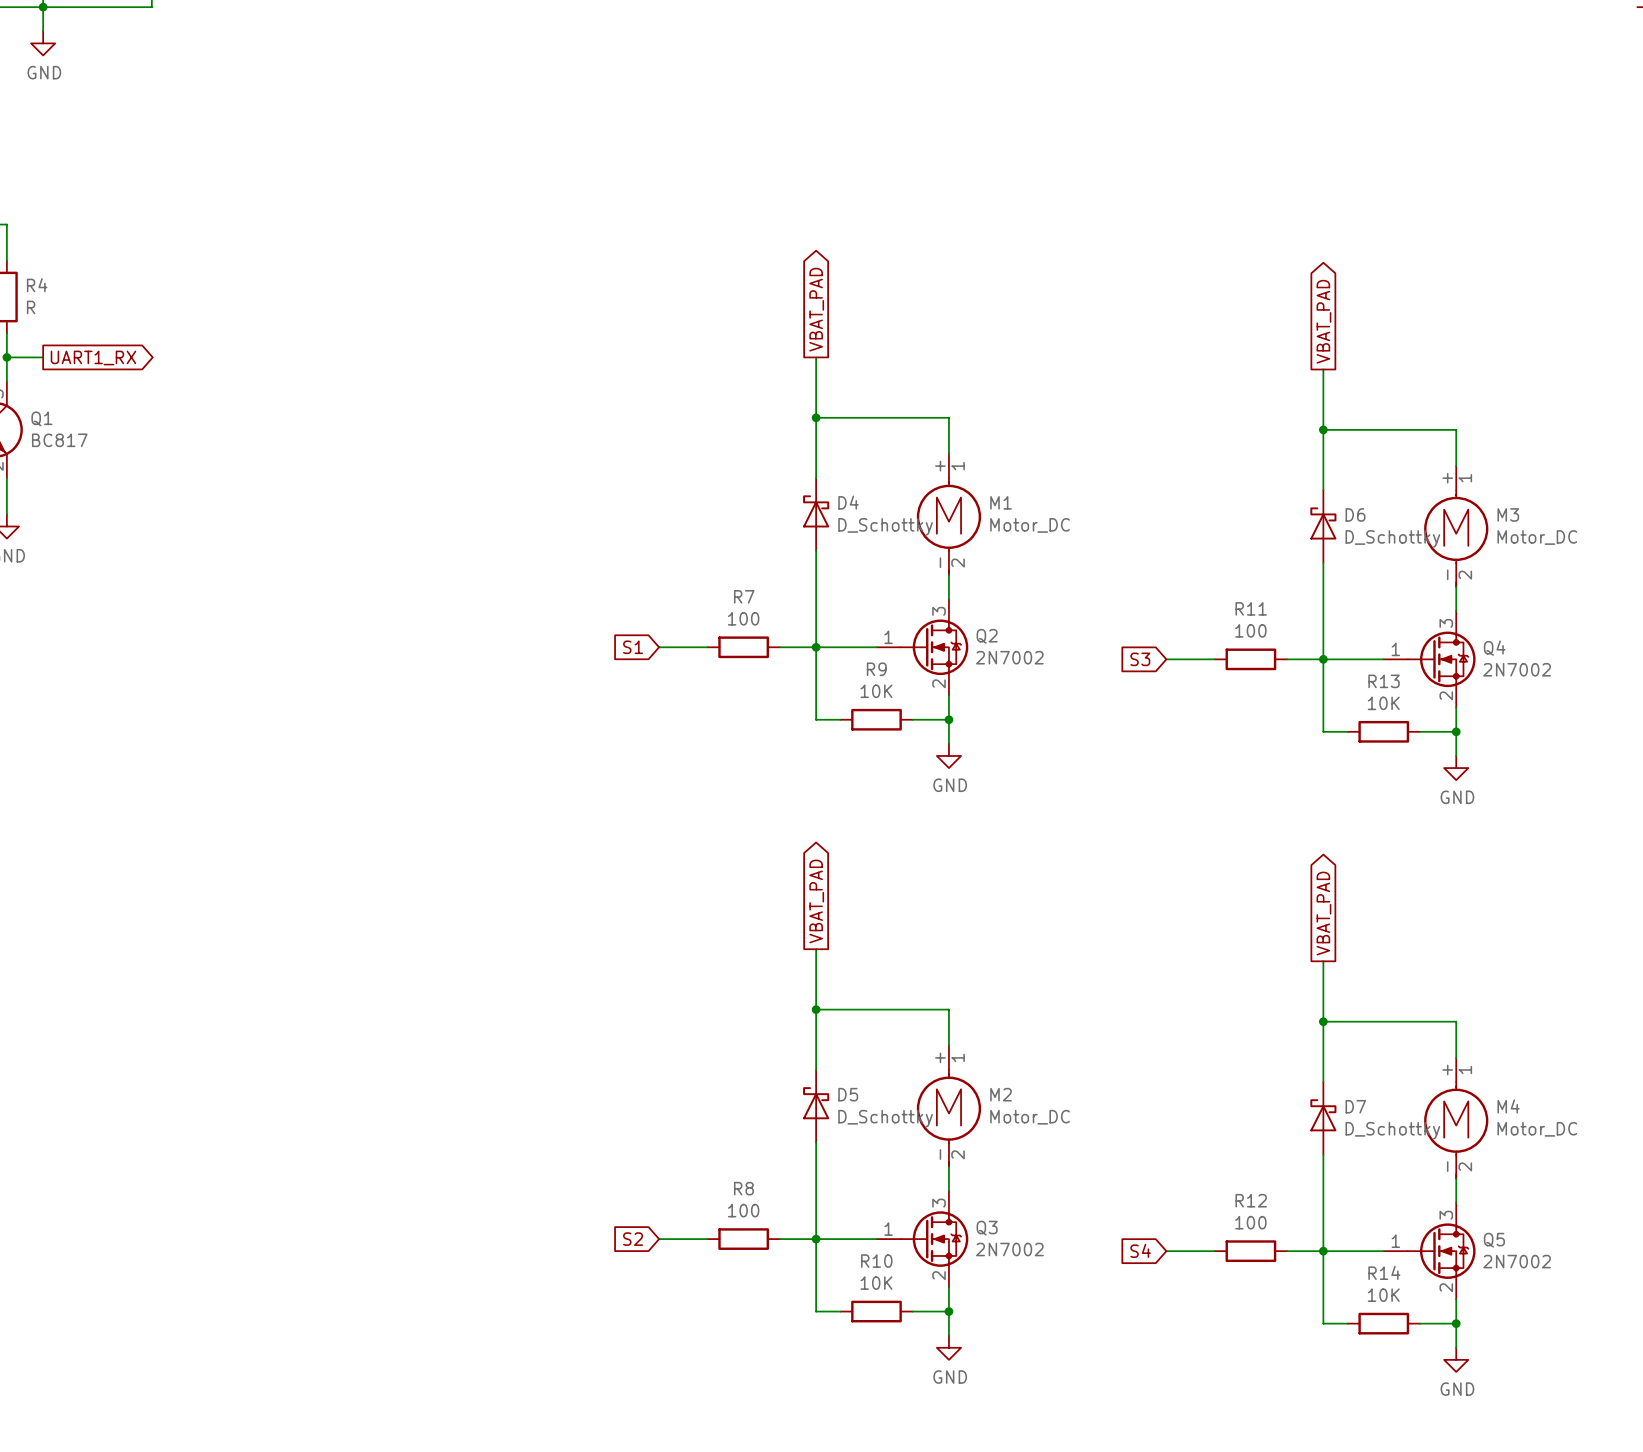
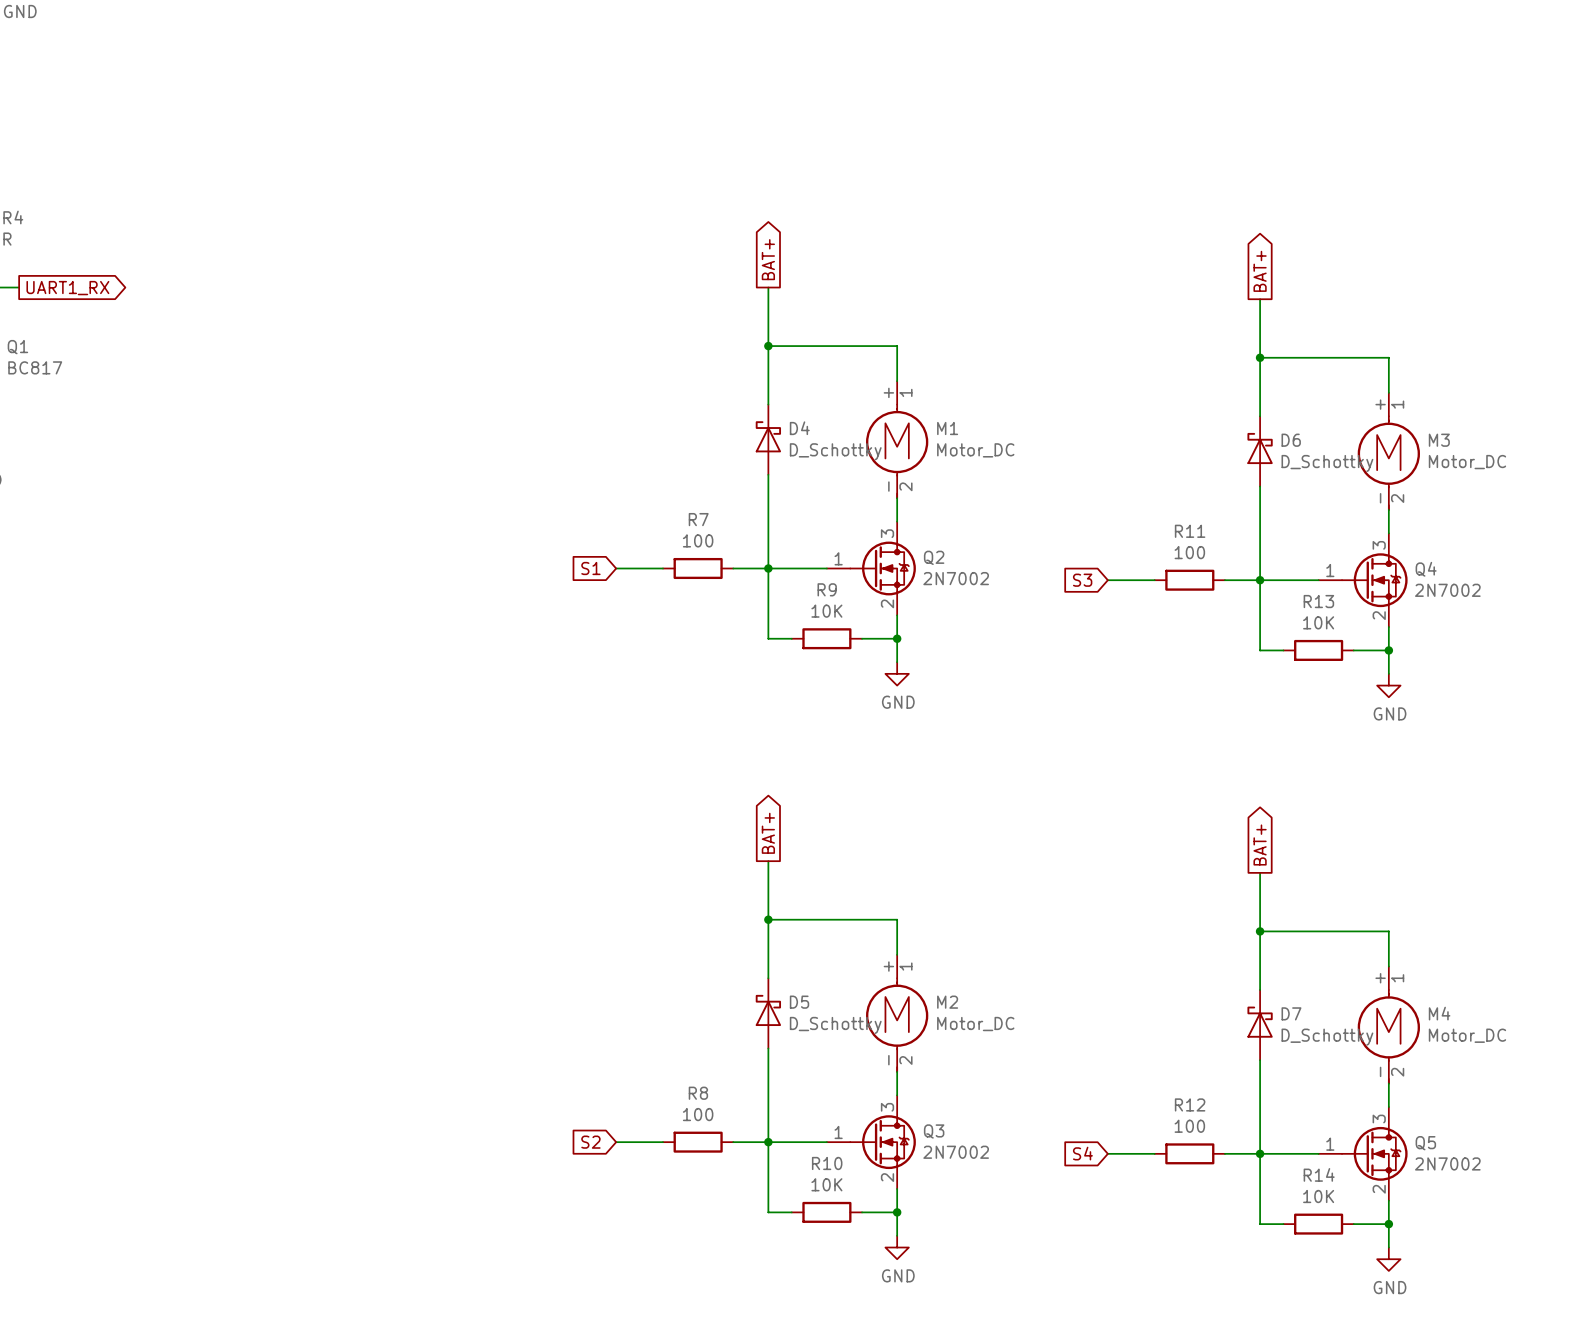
global label: VBAT_PAD (816, 309) -> BAT+ (768, 259)
global label: VBAT_PAD (1323, 321) -> BAT+ (1260, 271)
global label: VBAT_PAD (816, 901) -> BAT+ (768, 833)
global label: VBAT_PAD (1323, 913) -> BAT+ (1260, 844)

